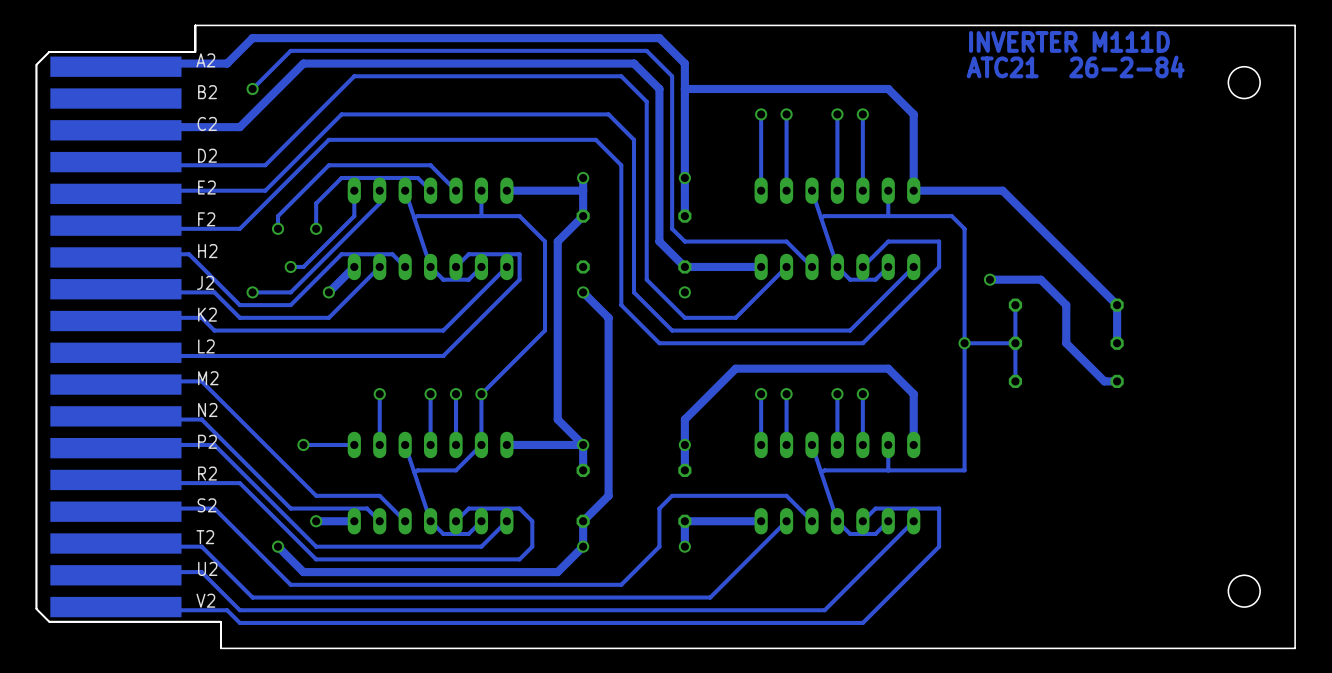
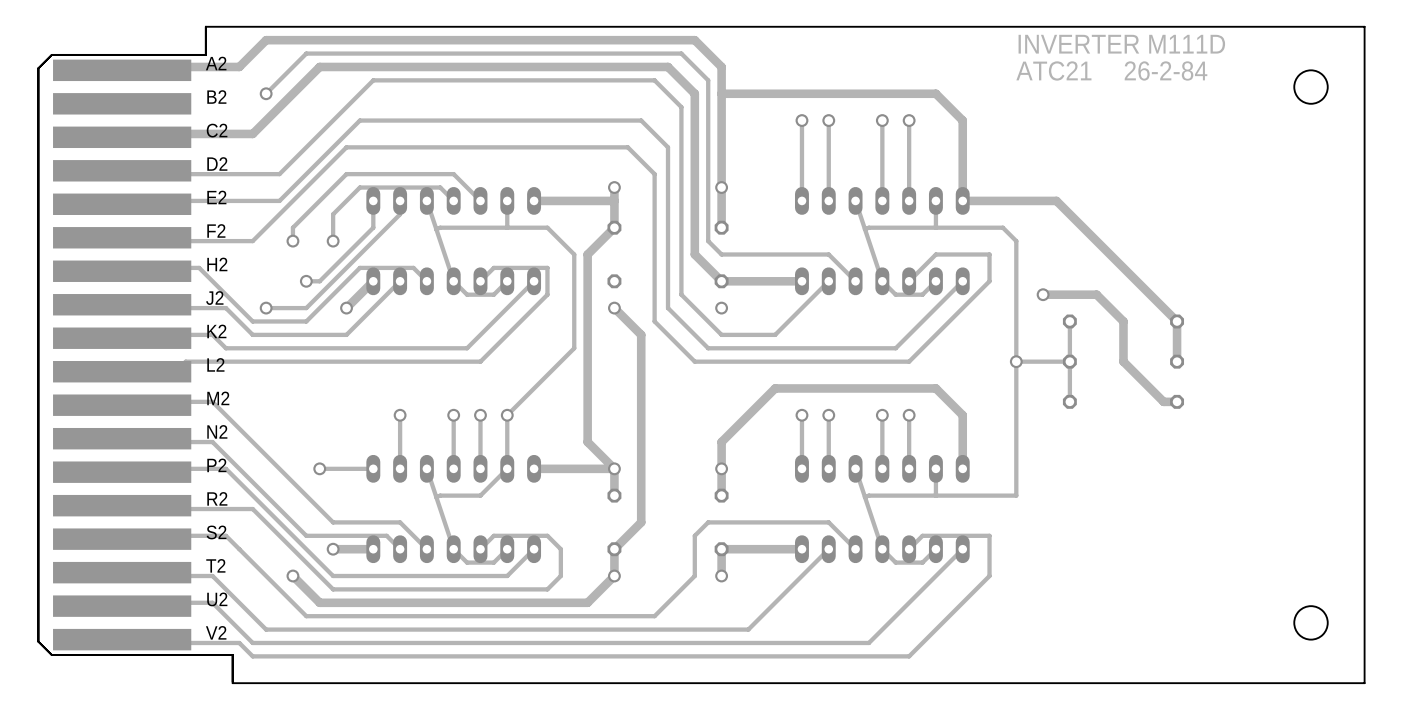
track: (456, 343) (443, 355) (163, 355) (154, 352) (115, 352) -> (480, 361) (185, 361) (175, 371) (122, 371)

